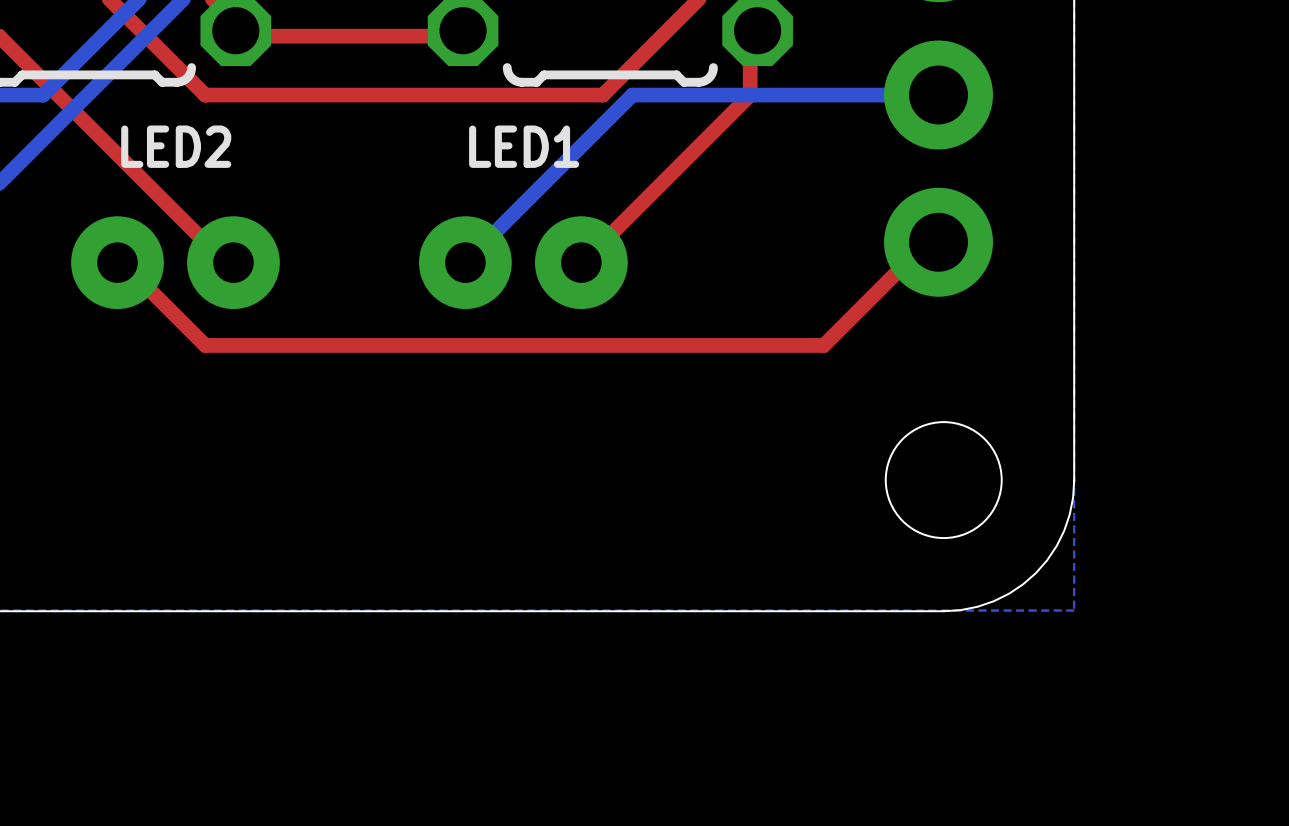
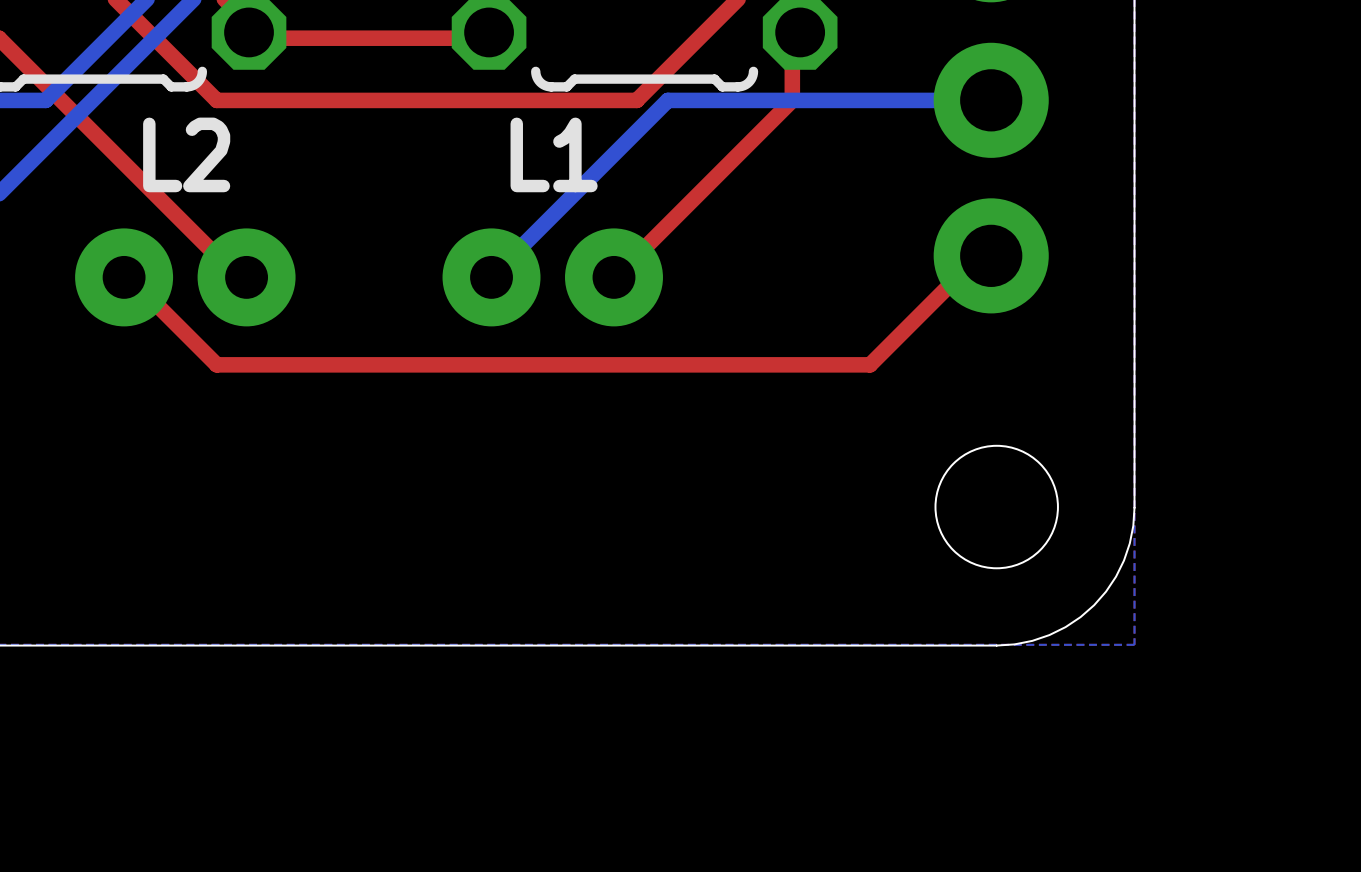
LED2 name: LED2 (176, 146) -> L2 (186, 154)
LED1 name: LED1 (524, 146) -> L1 (554, 154)

